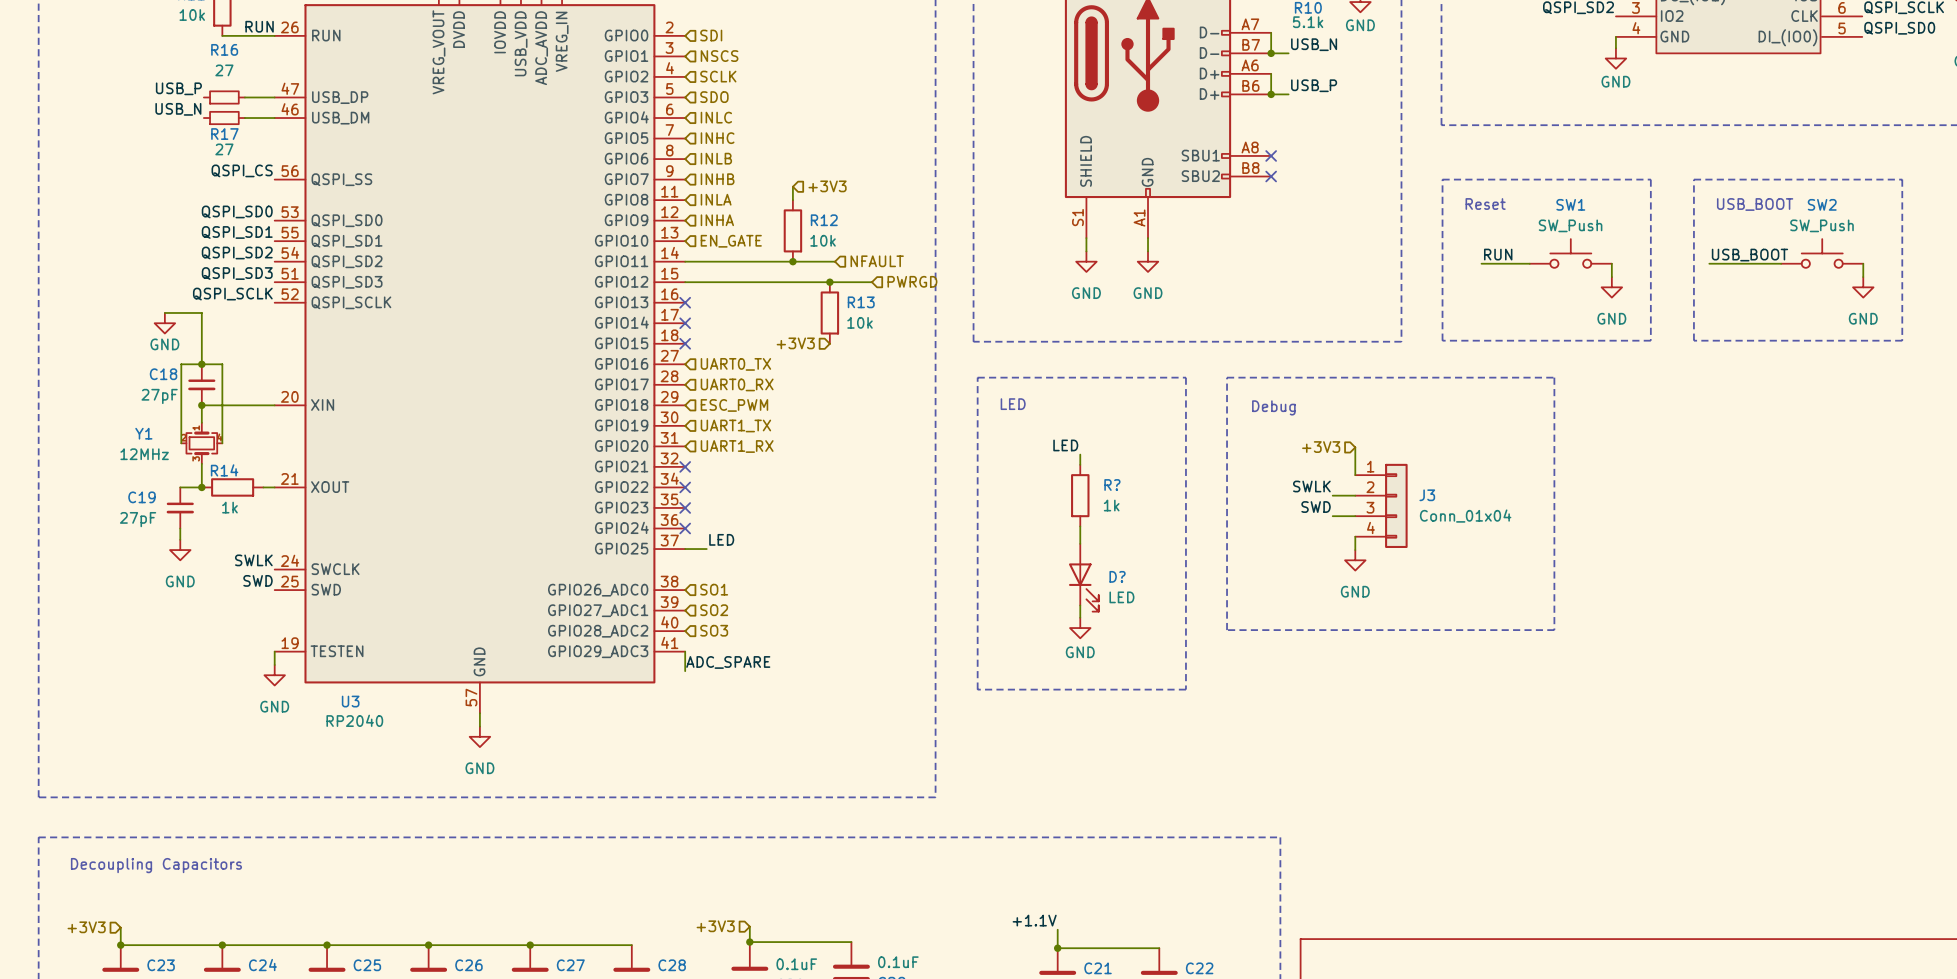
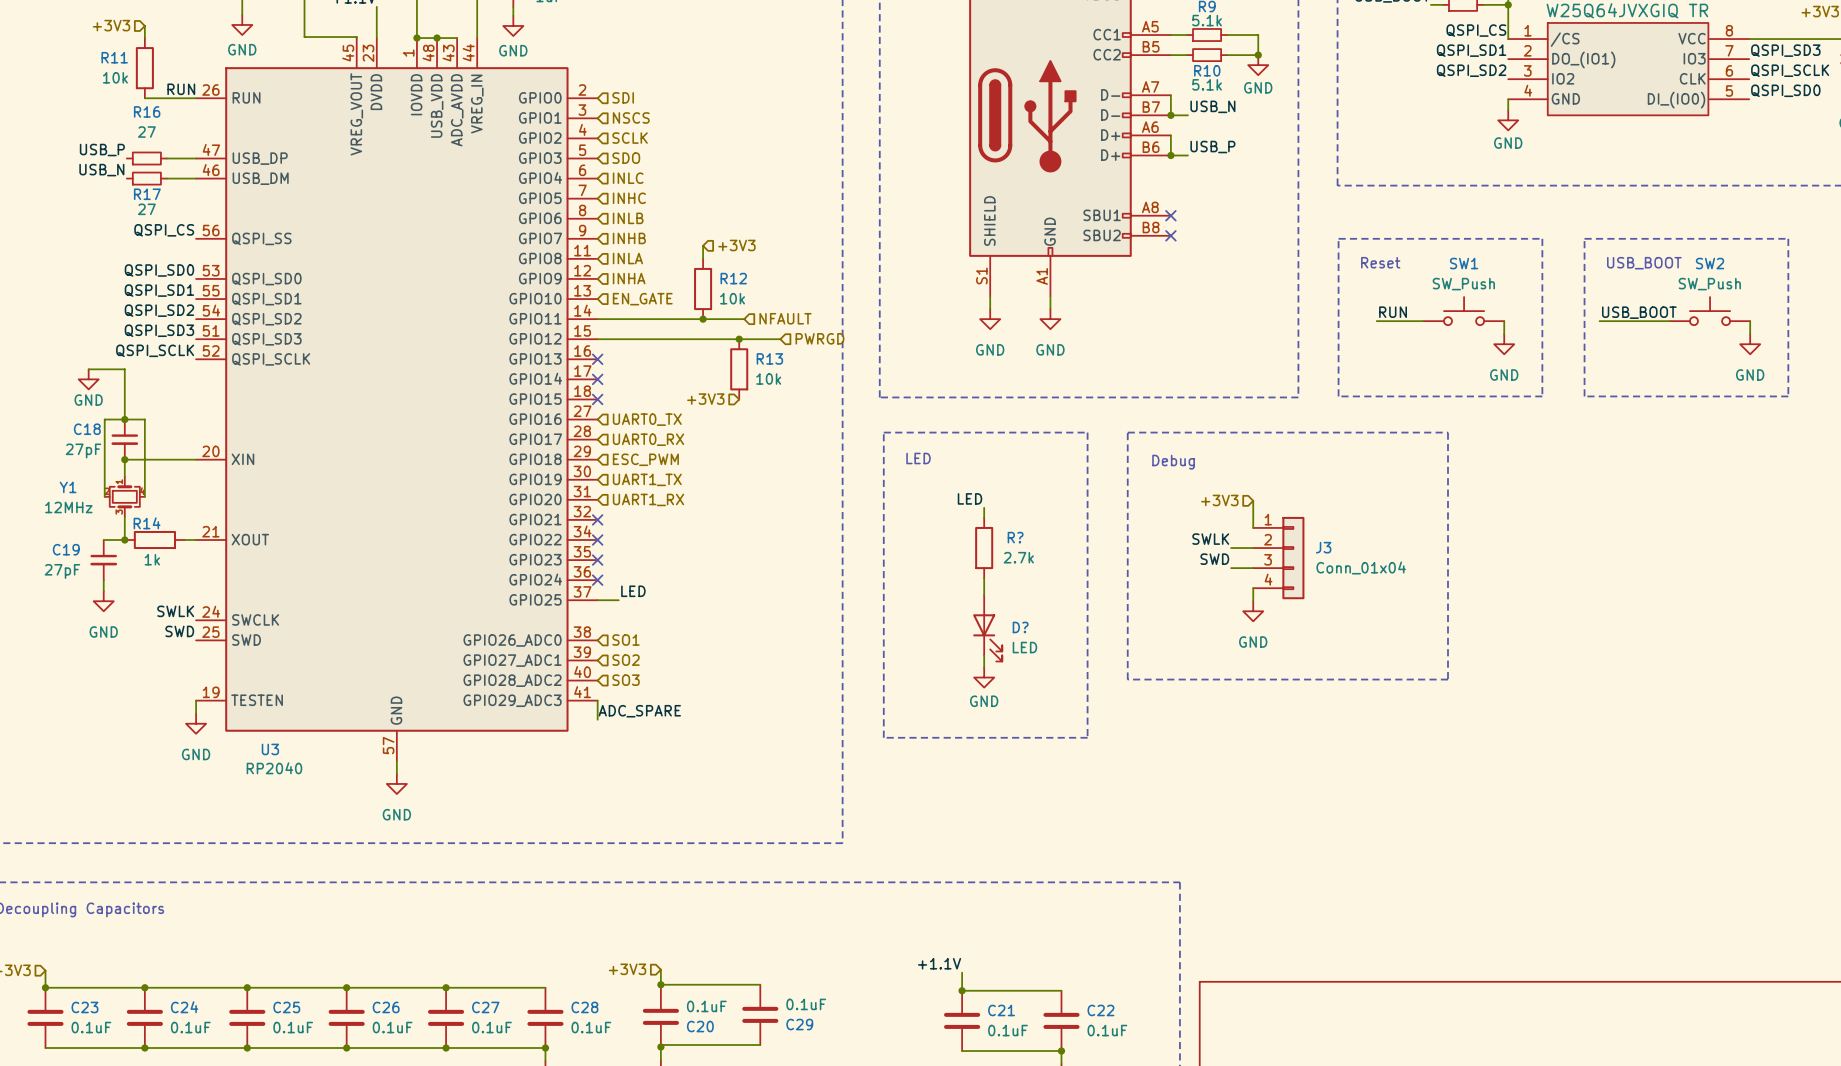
R? value: 1k (1111, 505) -> 2.7k (1018, 557)

